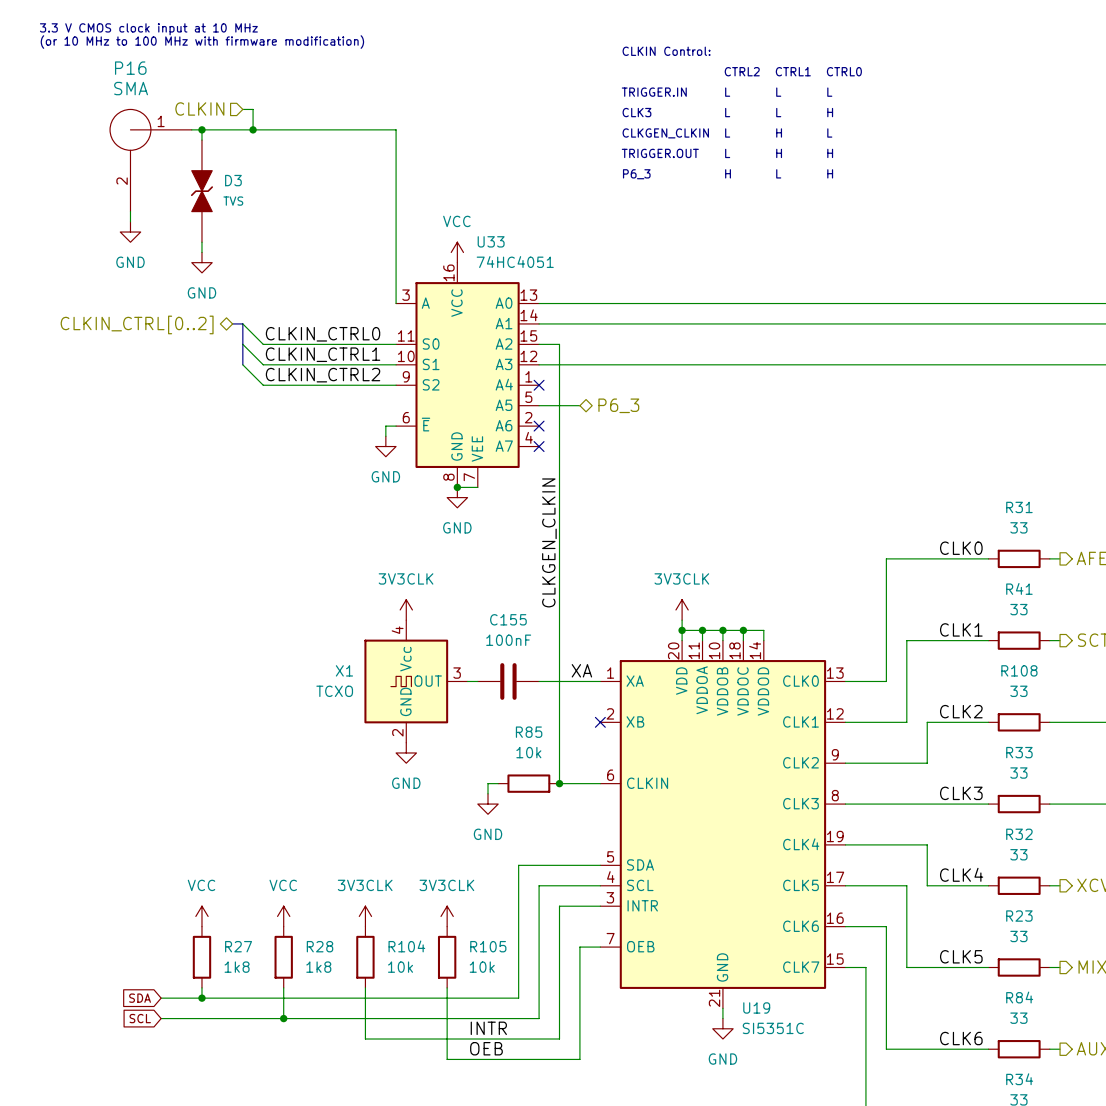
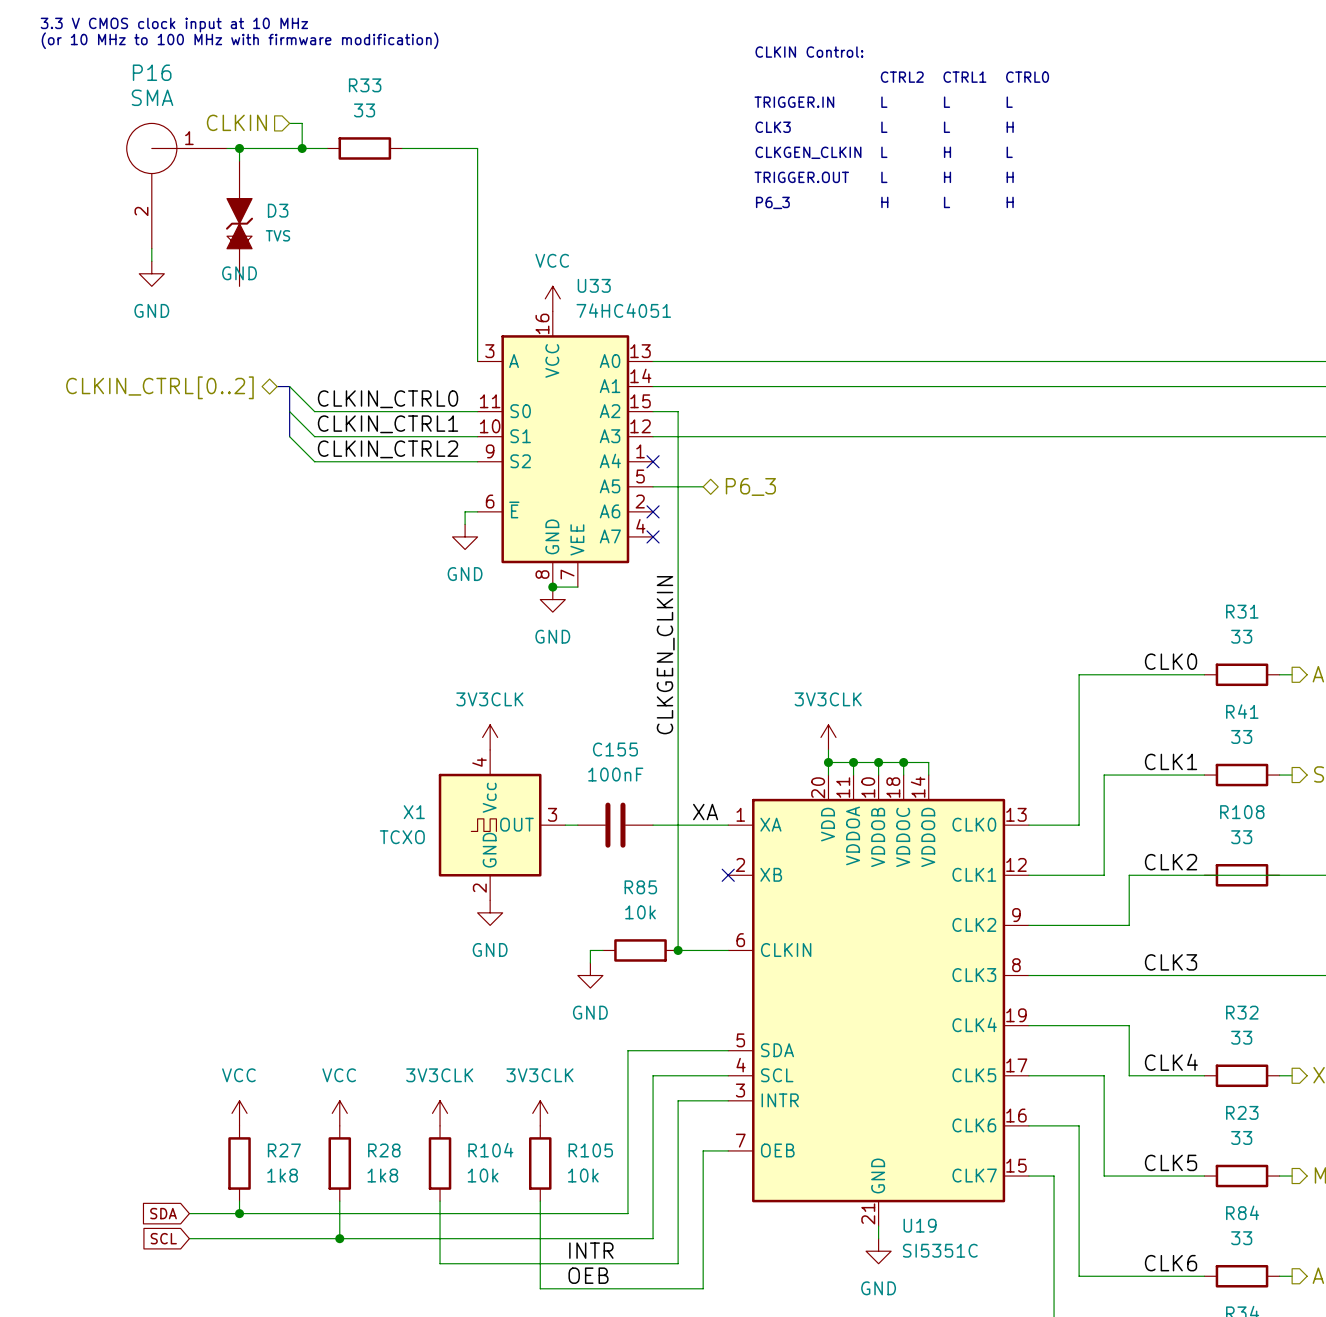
wire: (273, 129) (334, 129) -> none
wire: (201, 242) (201, 252) -> none
power symbol position: GND (201, 262) -> GND (239, 236)
wire: none -> (1204, 875) (1279, 875)
wire: none -> (1204, 975) (1279, 975)
R33 position: (1019, 804) -> (364, 148)

